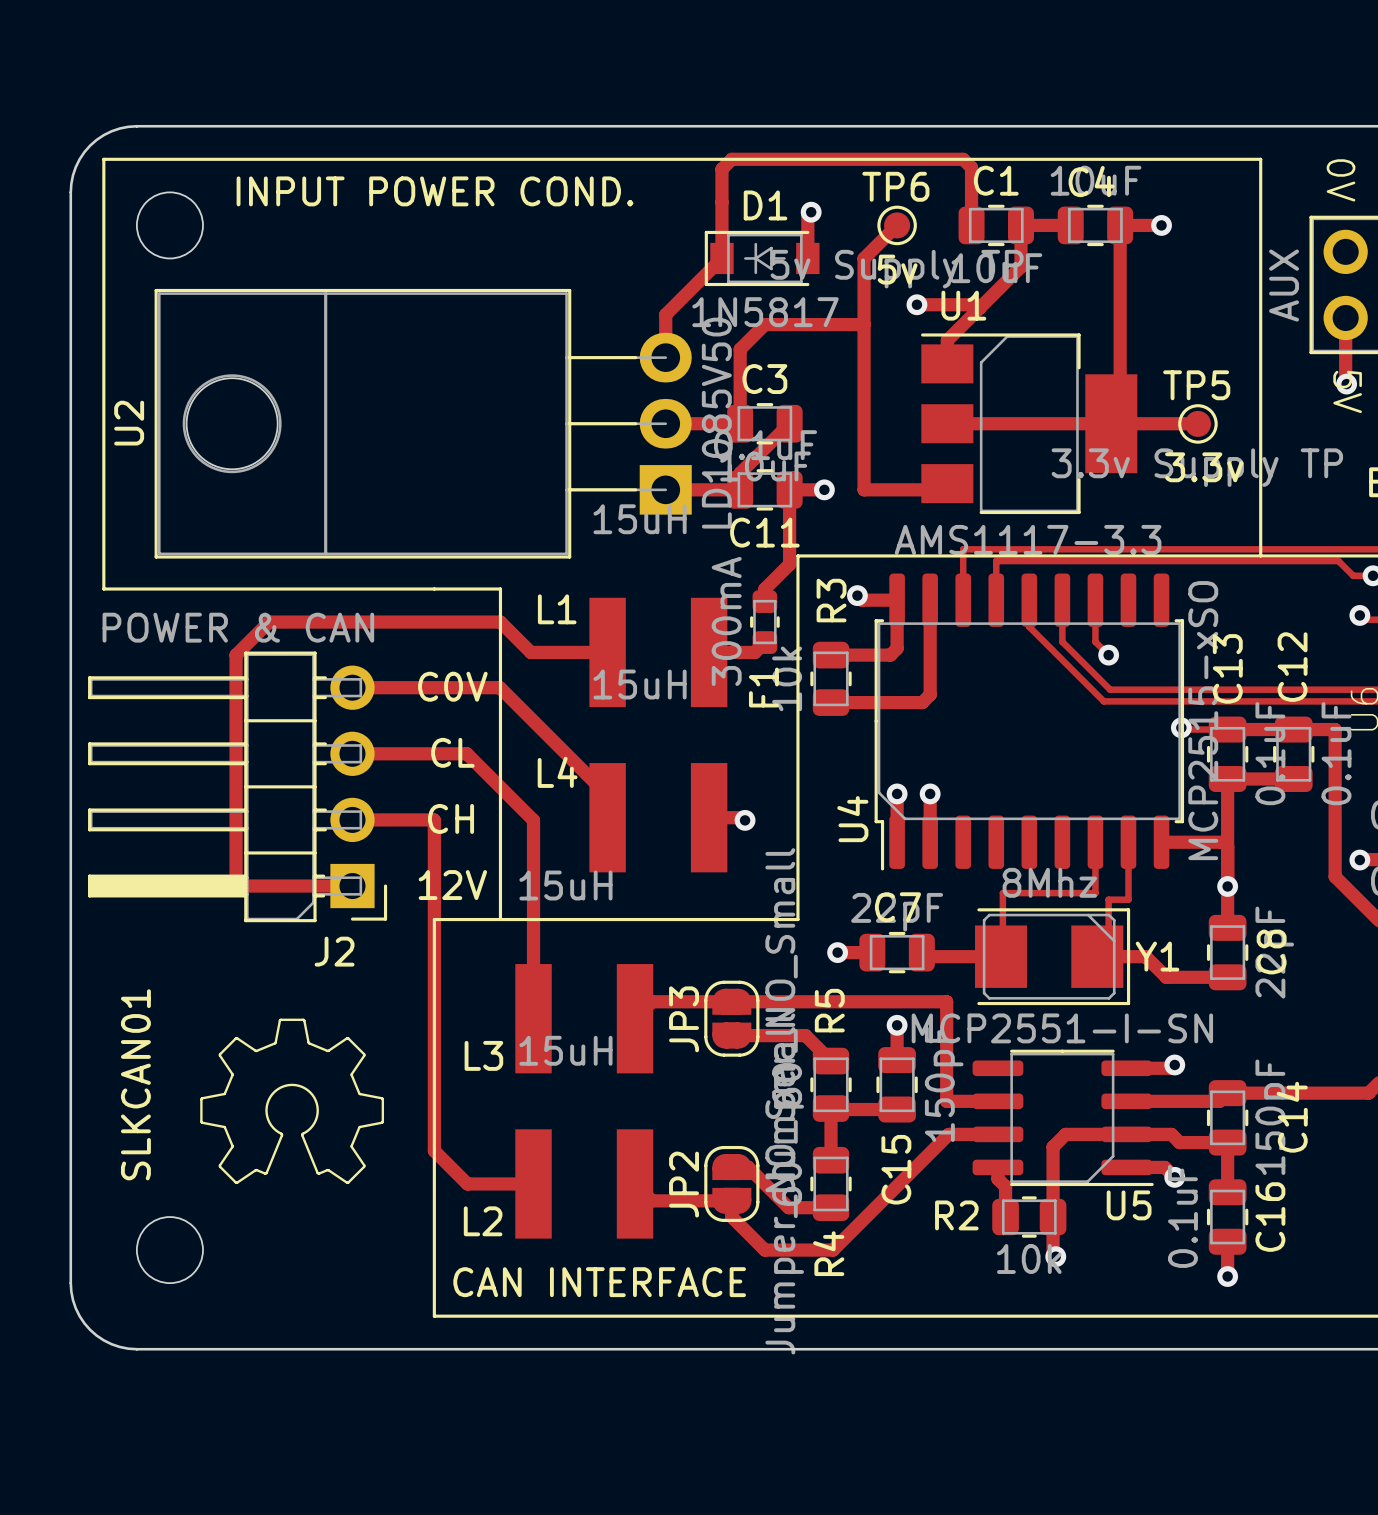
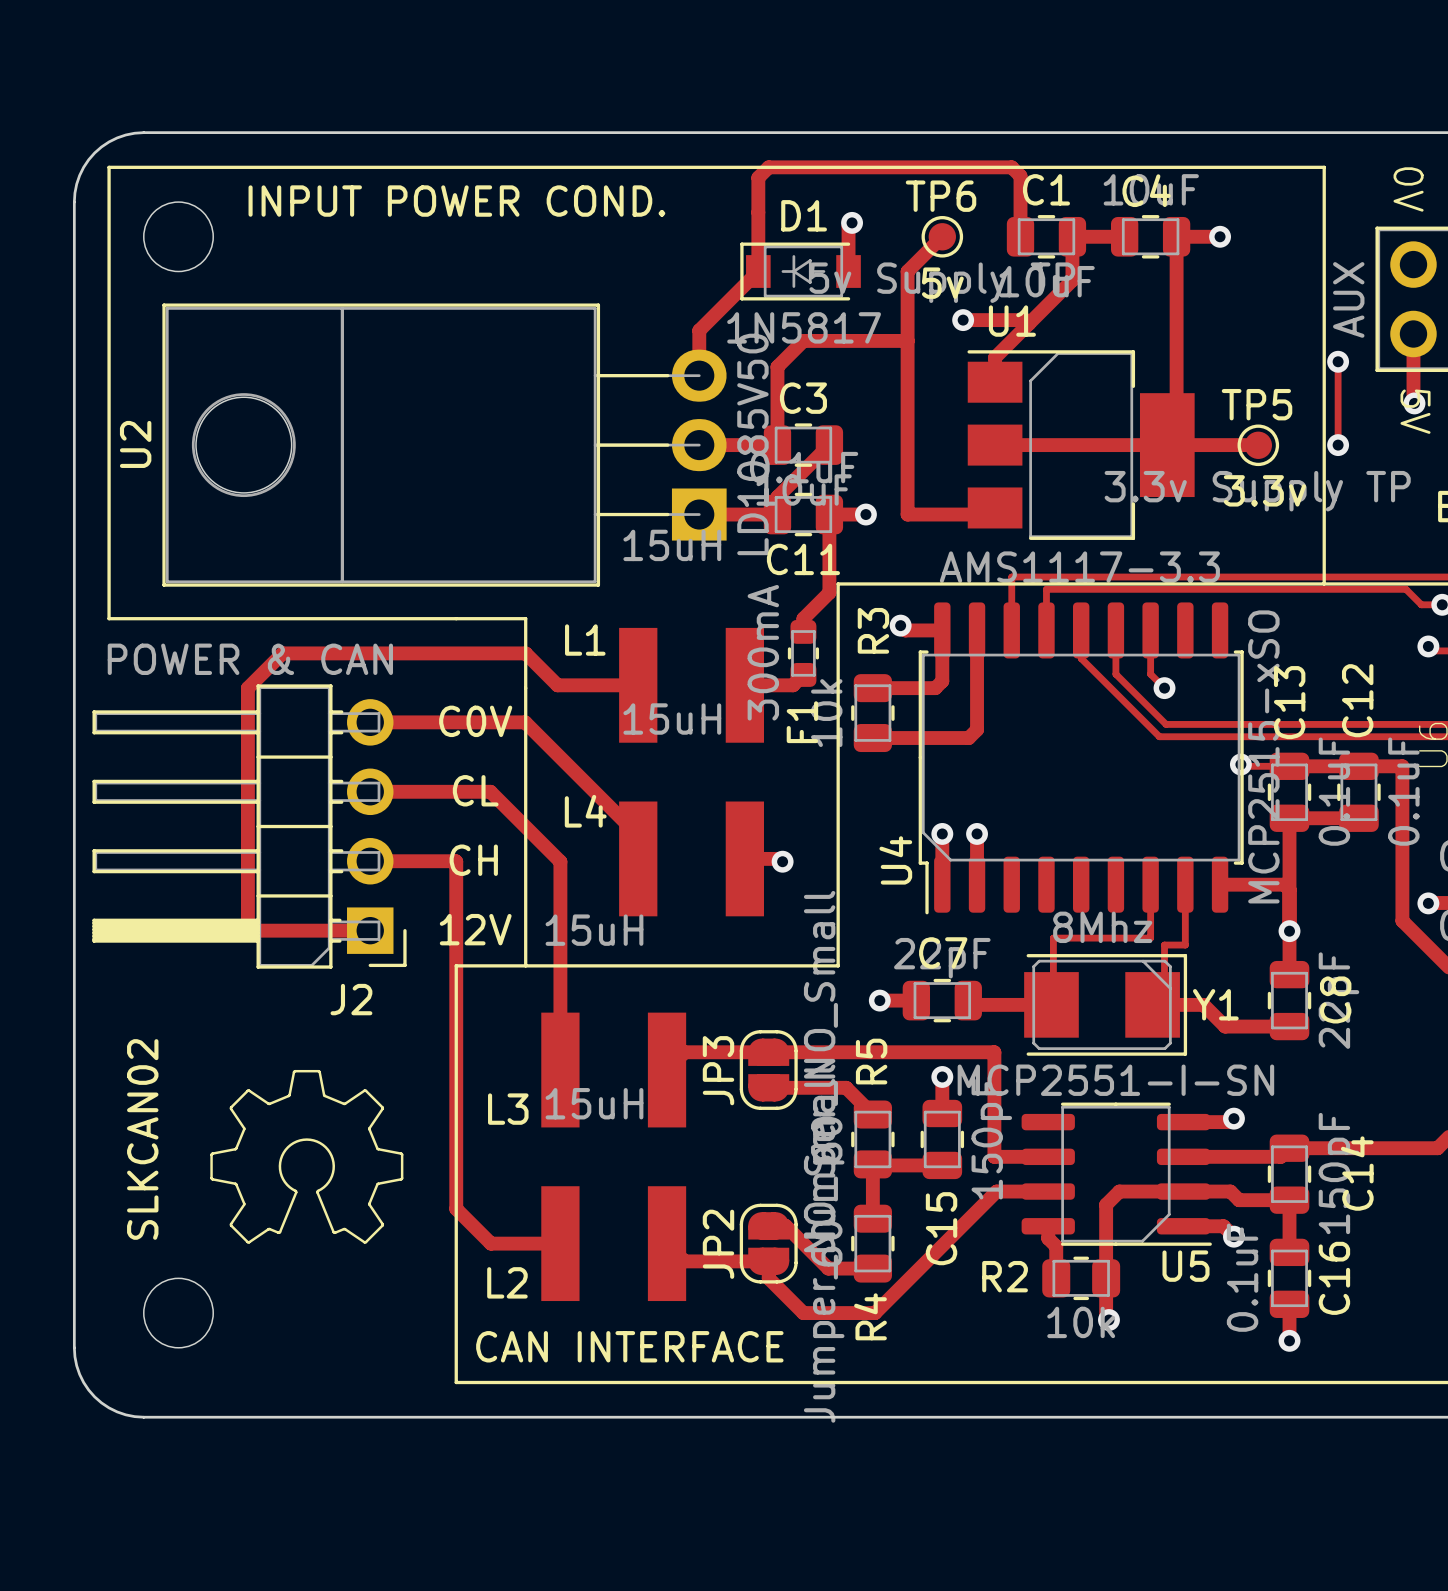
track: none -> (1338, 361) (1338, 445)
via: none -> (1338, 361)
via: none -> (1338, 445)
text: SLKCAN01 (135, 1084) -> SLKCAN02 (142, 1139)

